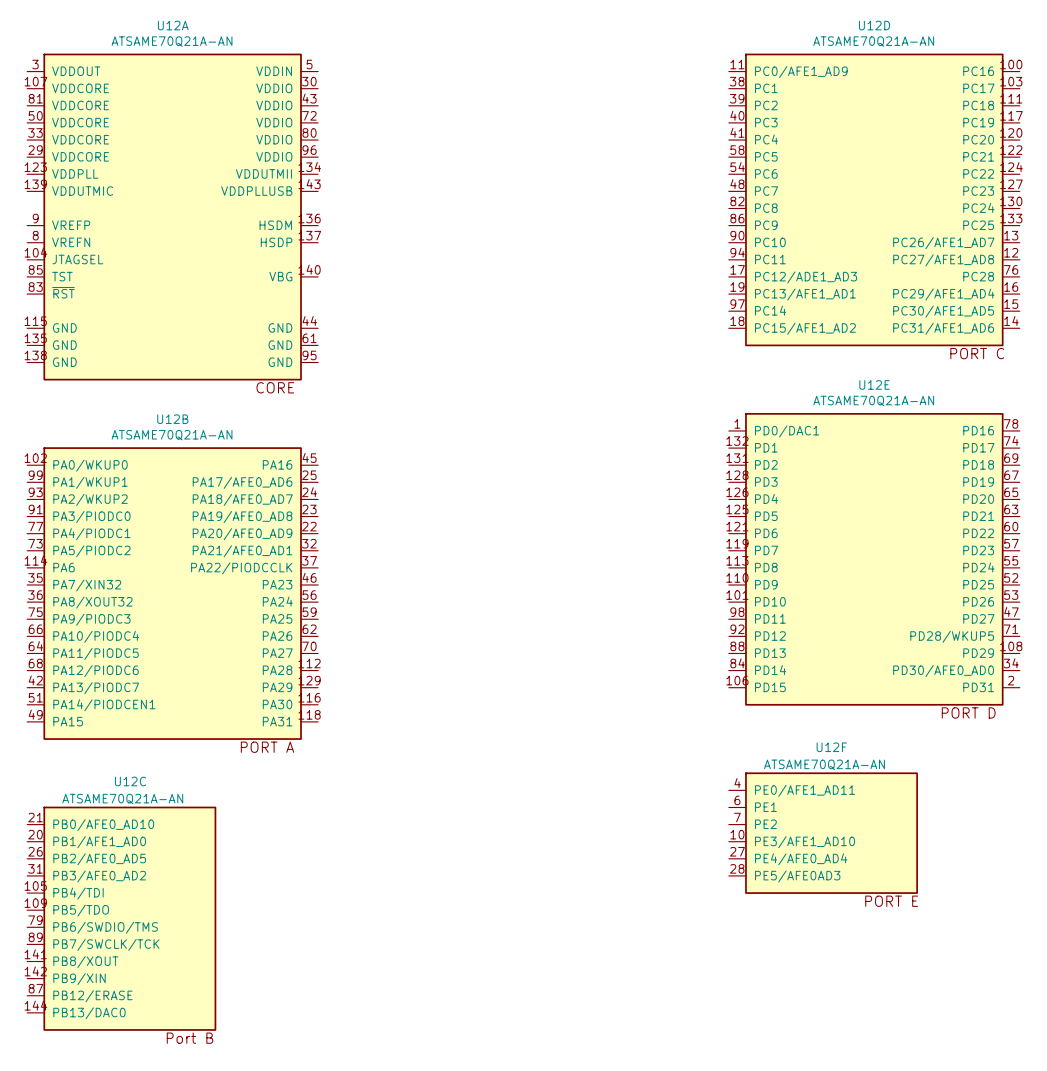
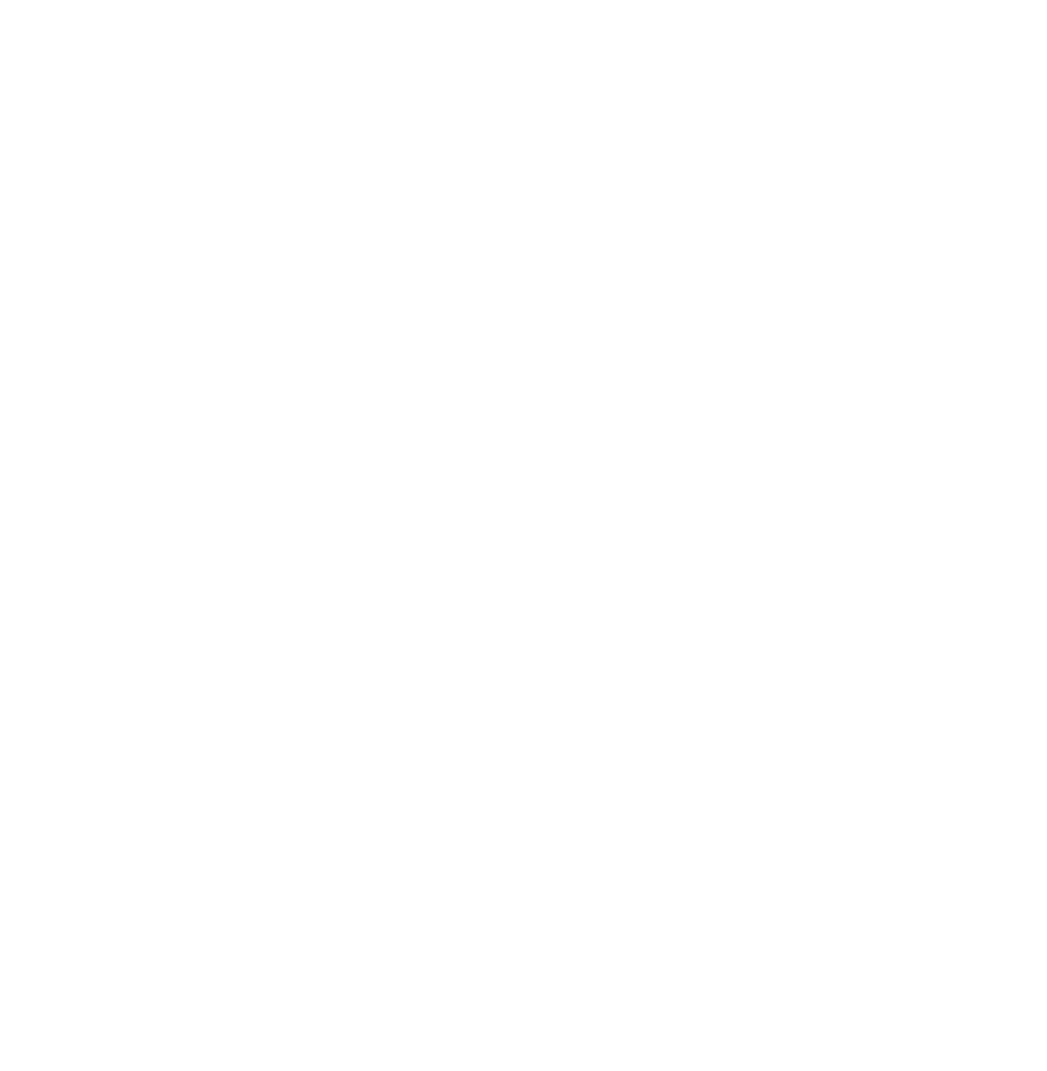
U12D: ATSAME70Q21A-AN (874, 199) -> none
U12A: ATSAME70Q21A-AN (172, 217) -> none
U12E: ATSAME70Q21A-AN (874, 559) -> none
U12B: ATSAME70Q21A-AN (172, 593) -> none
U12F: ATSAME70Q21A-AN (823, 833) -> none
U12C: ATSAME70Q21A-AN (121, 918) -> none

